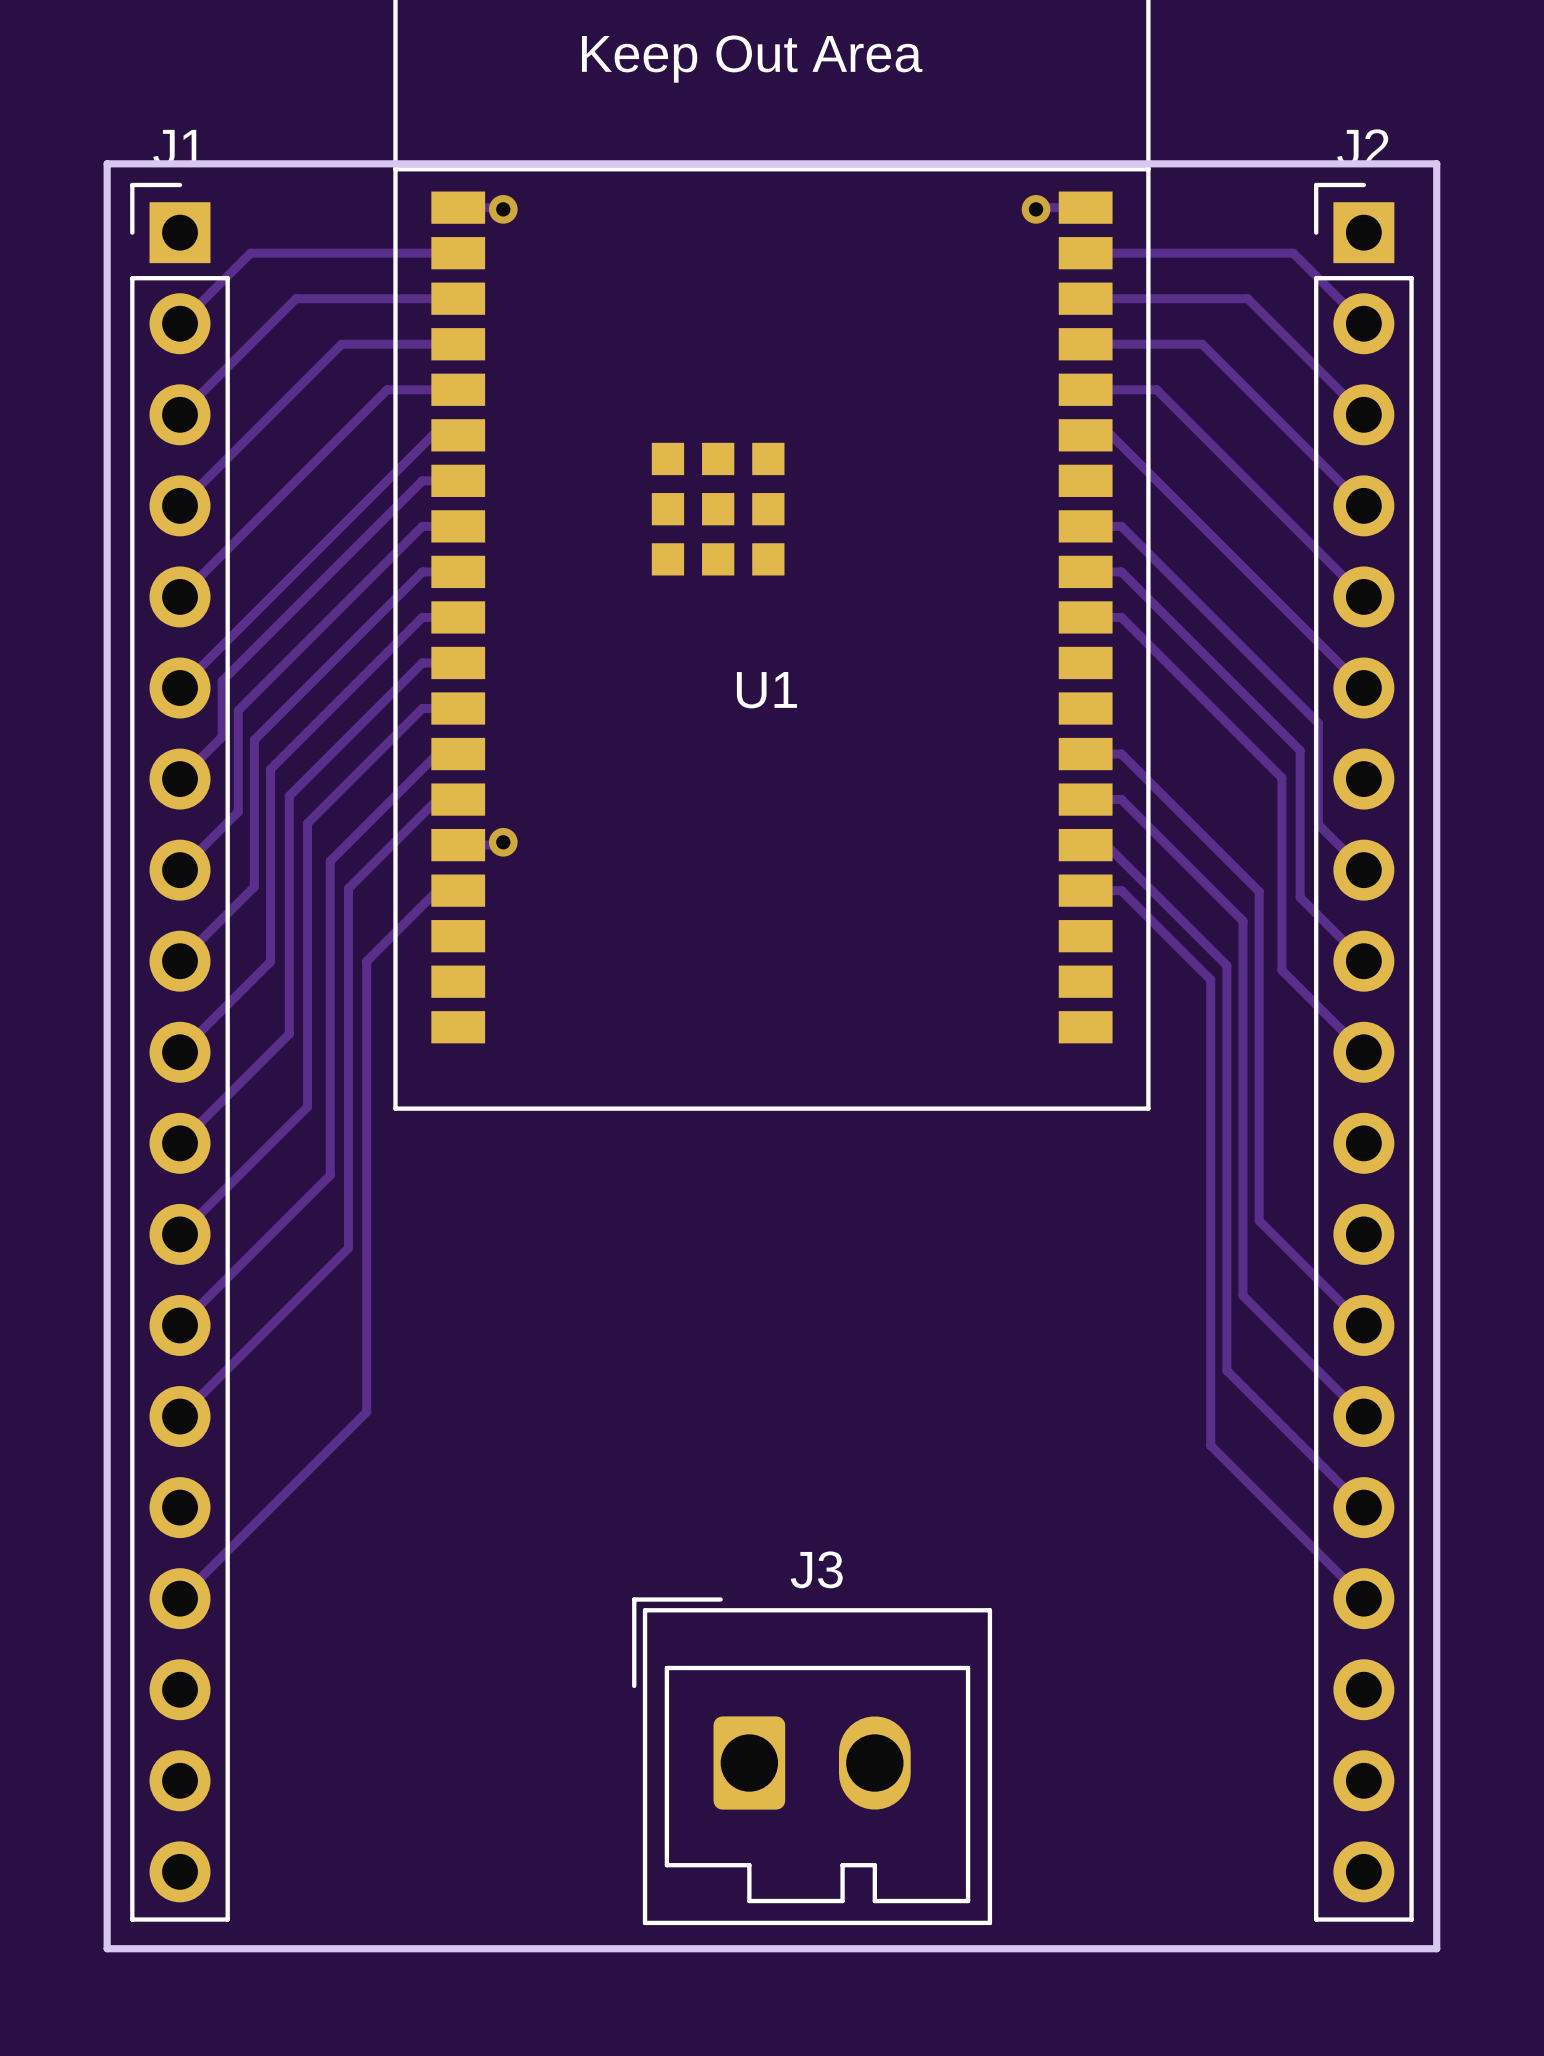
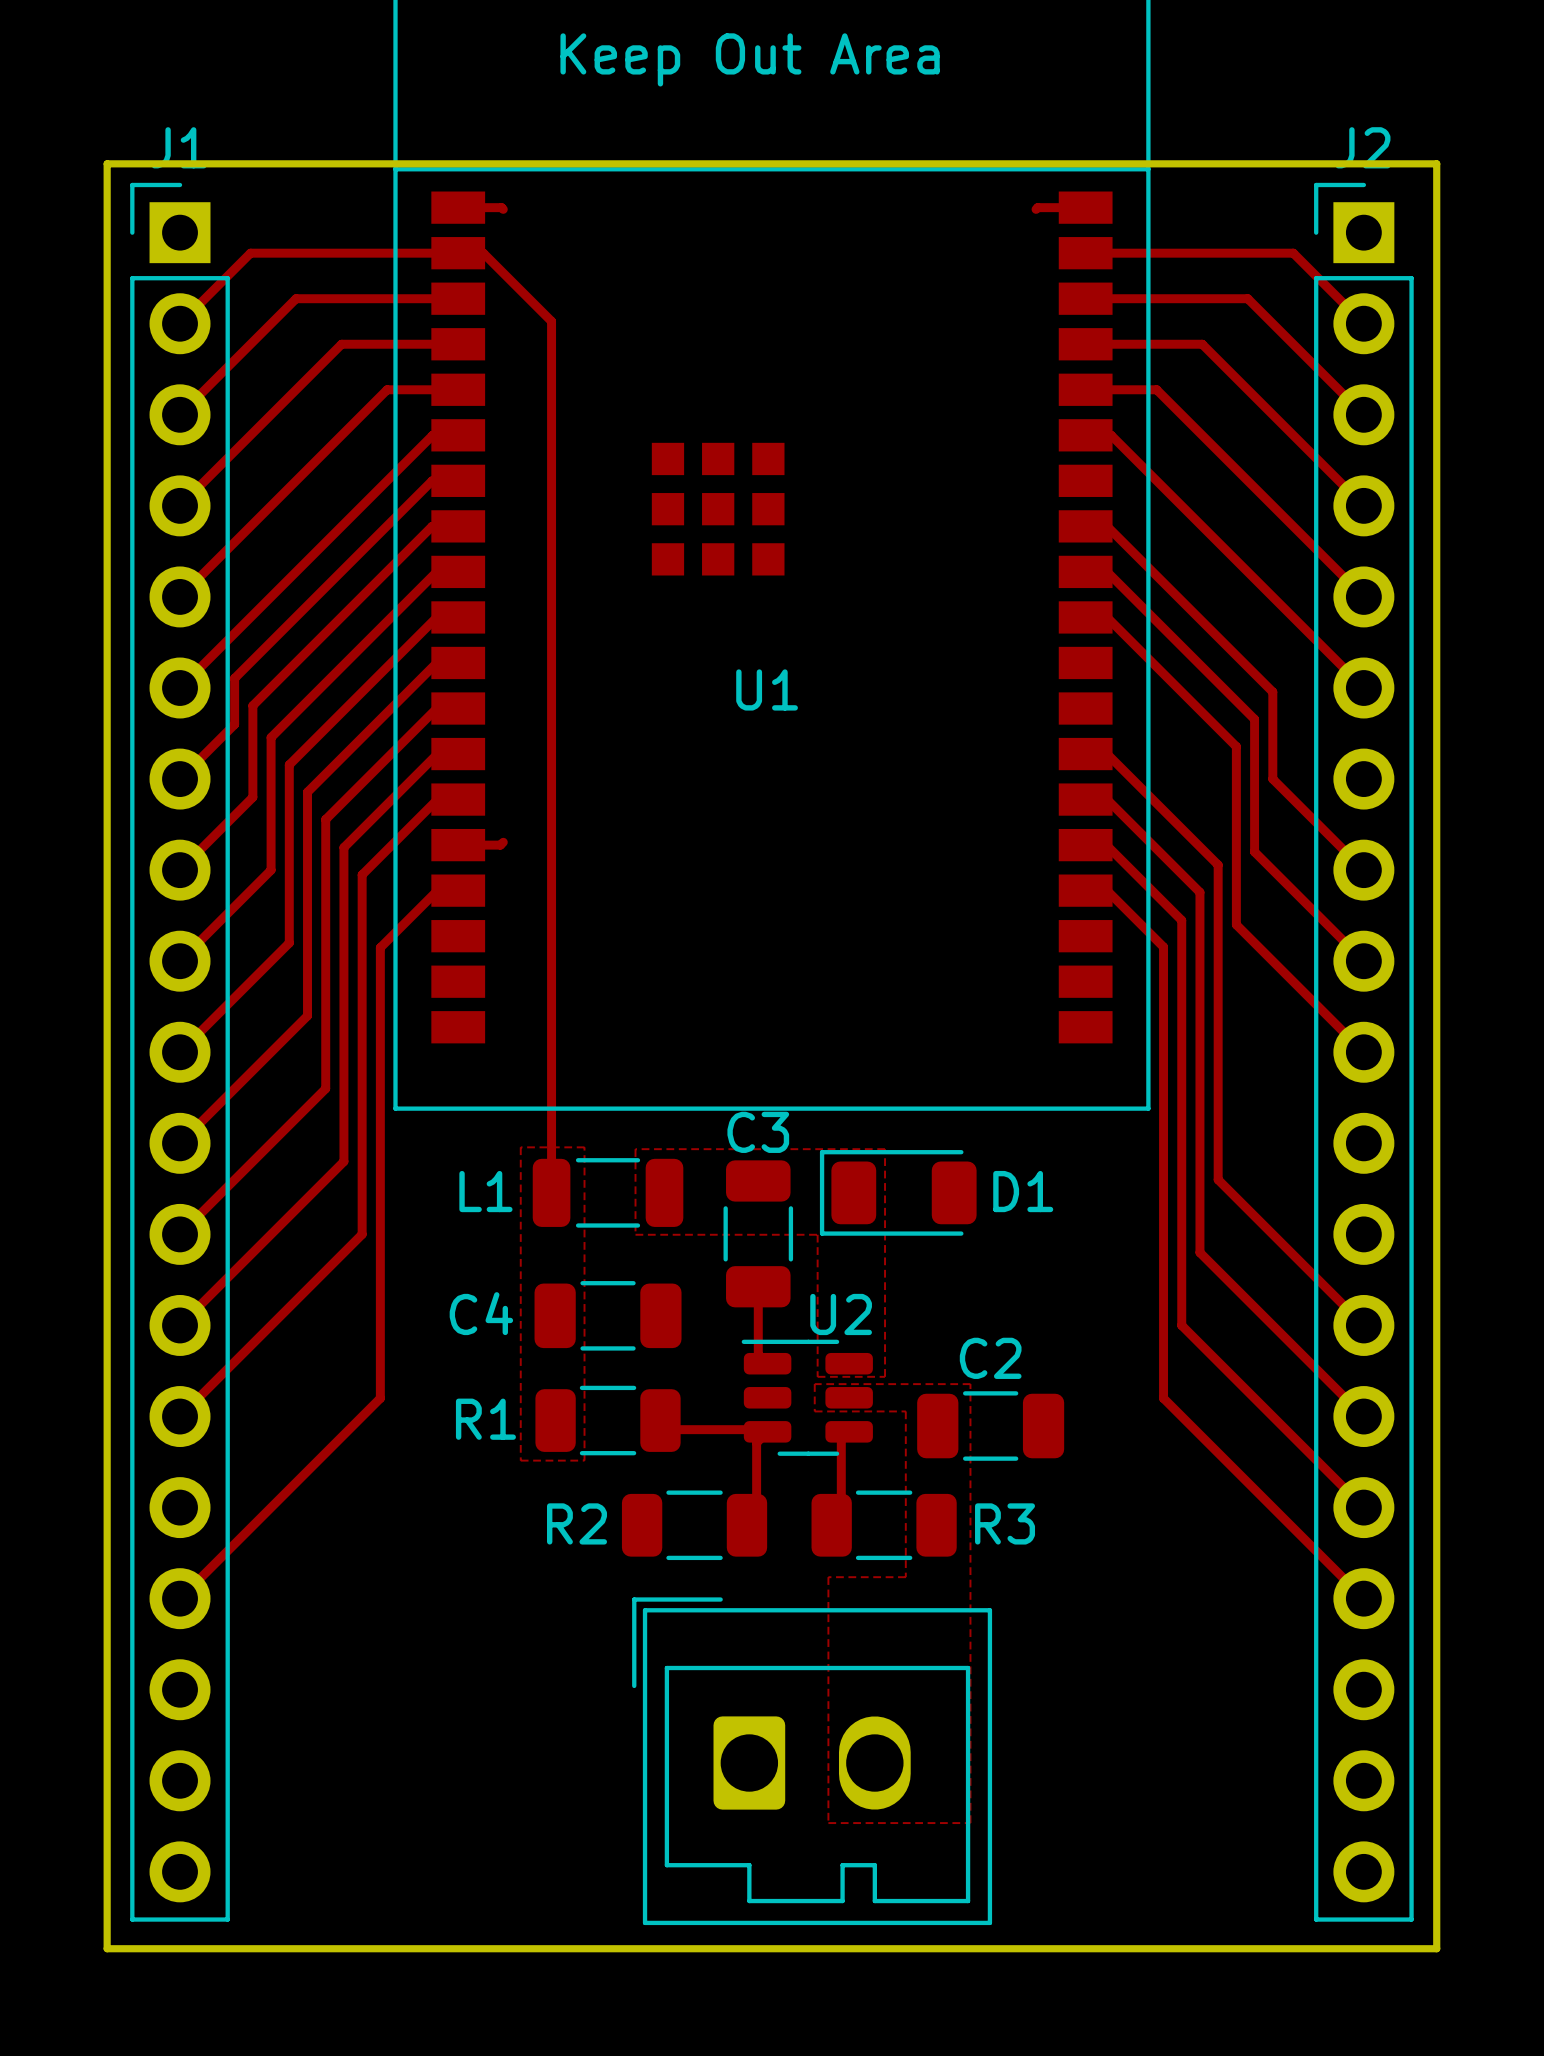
via: (503, 209) -> none
via: (1036, 209) -> none
track: none -> (458, 253) (483, 253) (551, 321) (551, 1192)
track: (432, 480) (422, 480) (222, 681) (222, 736) -> (432, 480) (234, 678) (234, 724) (222, 736)
track: (432, 526) (422, 526) (238, 710) (238, 811) -> (432, 526) (252, 705) (252, 797) (238, 811)
track: (1107, 526) (1121, 526) (1318, 723) (1318, 824) -> (1107, 526) (1272, 692) (1272, 779) (1318, 824)
track: (436, 571) (422, 571) (254, 739) (254, 886) -> (436, 571) (271, 737) (271, 870) (254, 886)
track: (1107, 571) (1121, 571) (1300, 750) (1300, 897) -> (1107, 571) (1254, 719) (1254, 851) (1300, 897)
track: (436, 617) (422, 617) (270, 769) (270, 961) -> (436, 617) (289, 764) (289, 796)
track: (1107, 617) (1121, 617) (1281, 777) (1281, 970) -> (1107, 617) (1236, 746) (1236, 924) (1281, 970)
track: (436, 662) (422, 662) (289, 796) -> (436, 662) (307, 792) (307, 823)
track: (436, 708) (422, 708) (307, 823) -> (436, 708) (325, 819) (325, 1088) (307, 1106)
track: (1107, 754) (1121, 754) (1259, 891) (1259, 1220) -> (1107, 754) (1218, 865) (1218, 1179) (1259, 1220)
track: (1107, 799) (1121, 799) (1243, 921) (1243, 1295) -> (1107, 799) (1199, 892) (1199, 1252) (1243, 1295)
via: (503, 842) -> none
track: (343, 847) (330, 861) (330, 1175) -> (343, 847) (343, 1161) (330, 1175)
track: (362, 874) (348, 888) (348, 1248) -> (362, 874) (362, 1234) (348, 1248)
track: (1107, 890) (1121, 890) (1210, 979) (1210, 1445) -> (1107, 890) (1163, 947) (1163, 1398) (1210, 1445)
track: (1181, 920) (1226, 965) (1226, 1370) -> (1181, 920) (1181, 1325) (1226, 1370)
track: (289, 942) (289, 1034) -> (289, 942) (270, 961)
track: (380, 947) (366, 961) (366, 1411) -> (380, 947) (380, 1398) (366, 1411)
track: (307, 1015) (307, 1106) -> (307, 1015) (289, 1034)
zone outline: none -> (520, 1147) (584, 1147) (584, 1460) (520, 1460) (520, 1147)
zone outline: none -> (635, 1149) (885, 1149) (885, 1376) (817, 1376) (817, 1234) (635, 1234) (635, 1149)
L1: none -> (608, 1192)
D1: none -> (898, 1192)
C3: none -> (758, 1233)
track: none -> (758, 1286) (758, 1354) (767, 1363)
C4: none -> (608, 1315)
zone outline: none -> (814, 1384) (970, 1384) (970, 1823) (828, 1823) (828, 1577) (905, 1577) (905, 1411) (814, 1411) (814, 1384)
U2: none -> (807, 1397)
R1: none -> (608, 1420)
track: none -> (660, 1420) (669, 1429) (765, 1429) (767, 1431) (756, 1442) (756, 1515) (746, 1525)
C2: none -> (990, 1426)
track: none -> (849, 1431) (841, 1439) (841, 1515) (831, 1525)
R2: none -> (694, 1525)
R3: none -> (884, 1525)
J3 name: J3 (816, 1569) -> none

